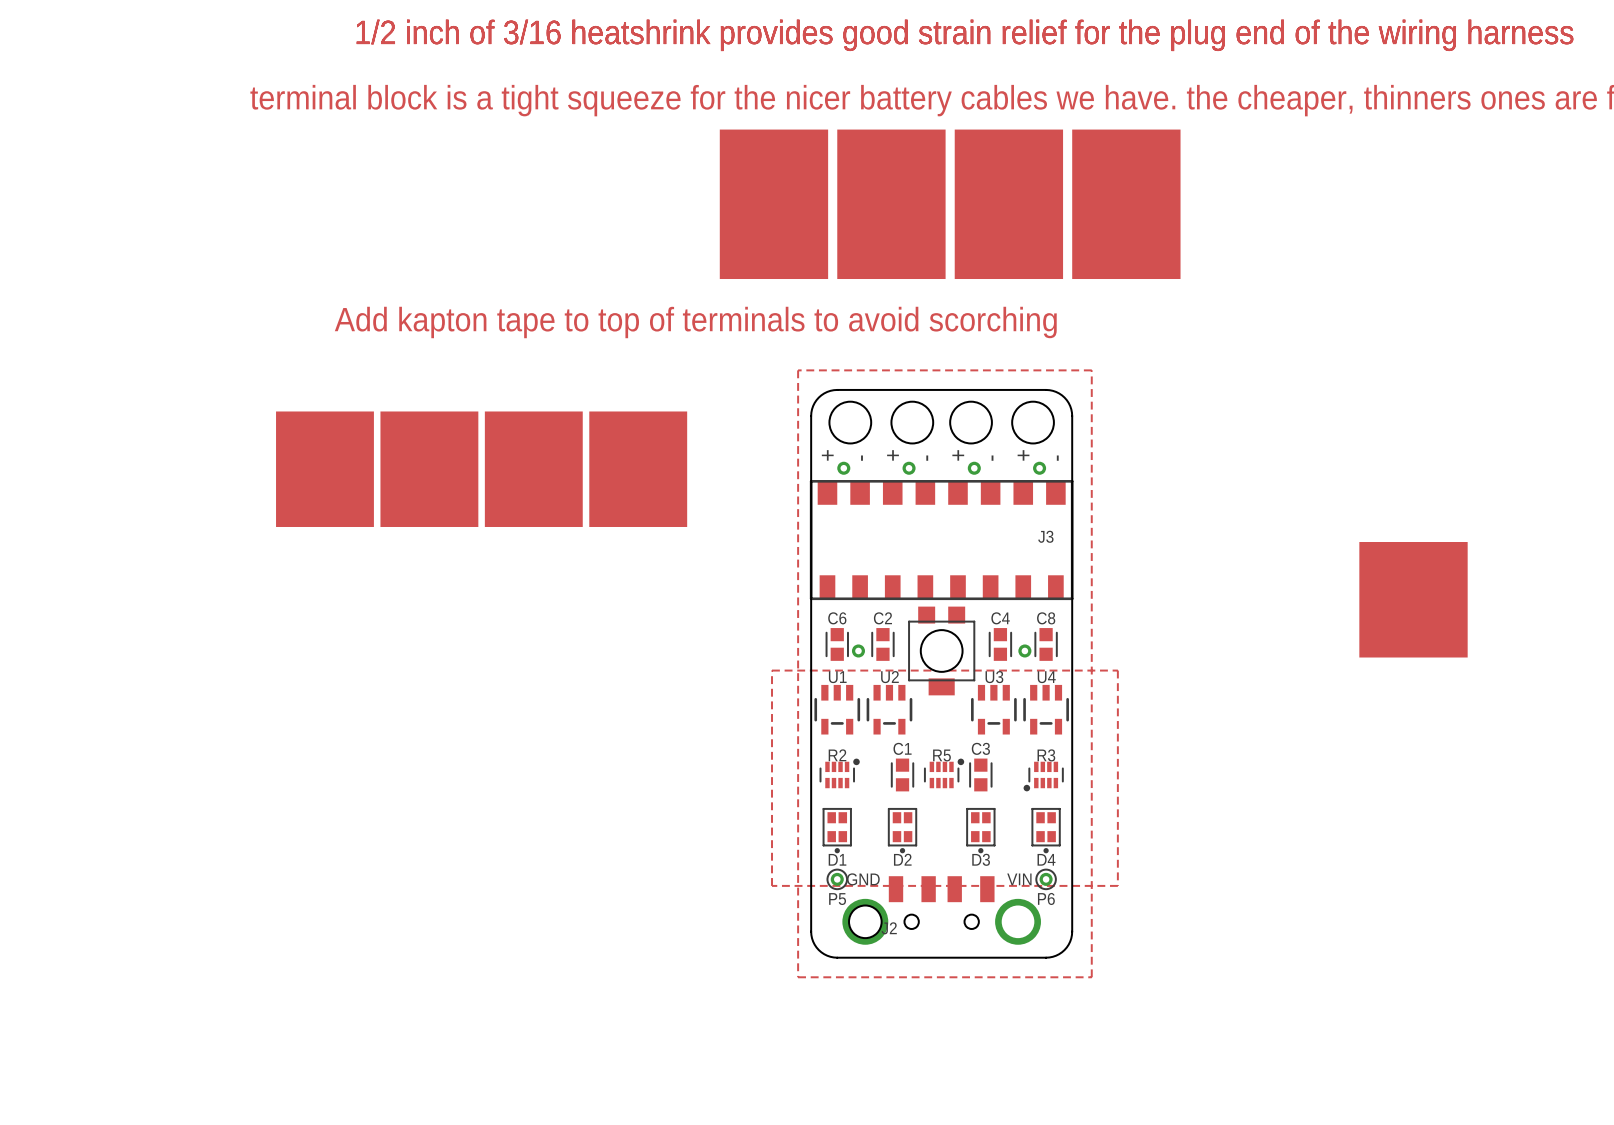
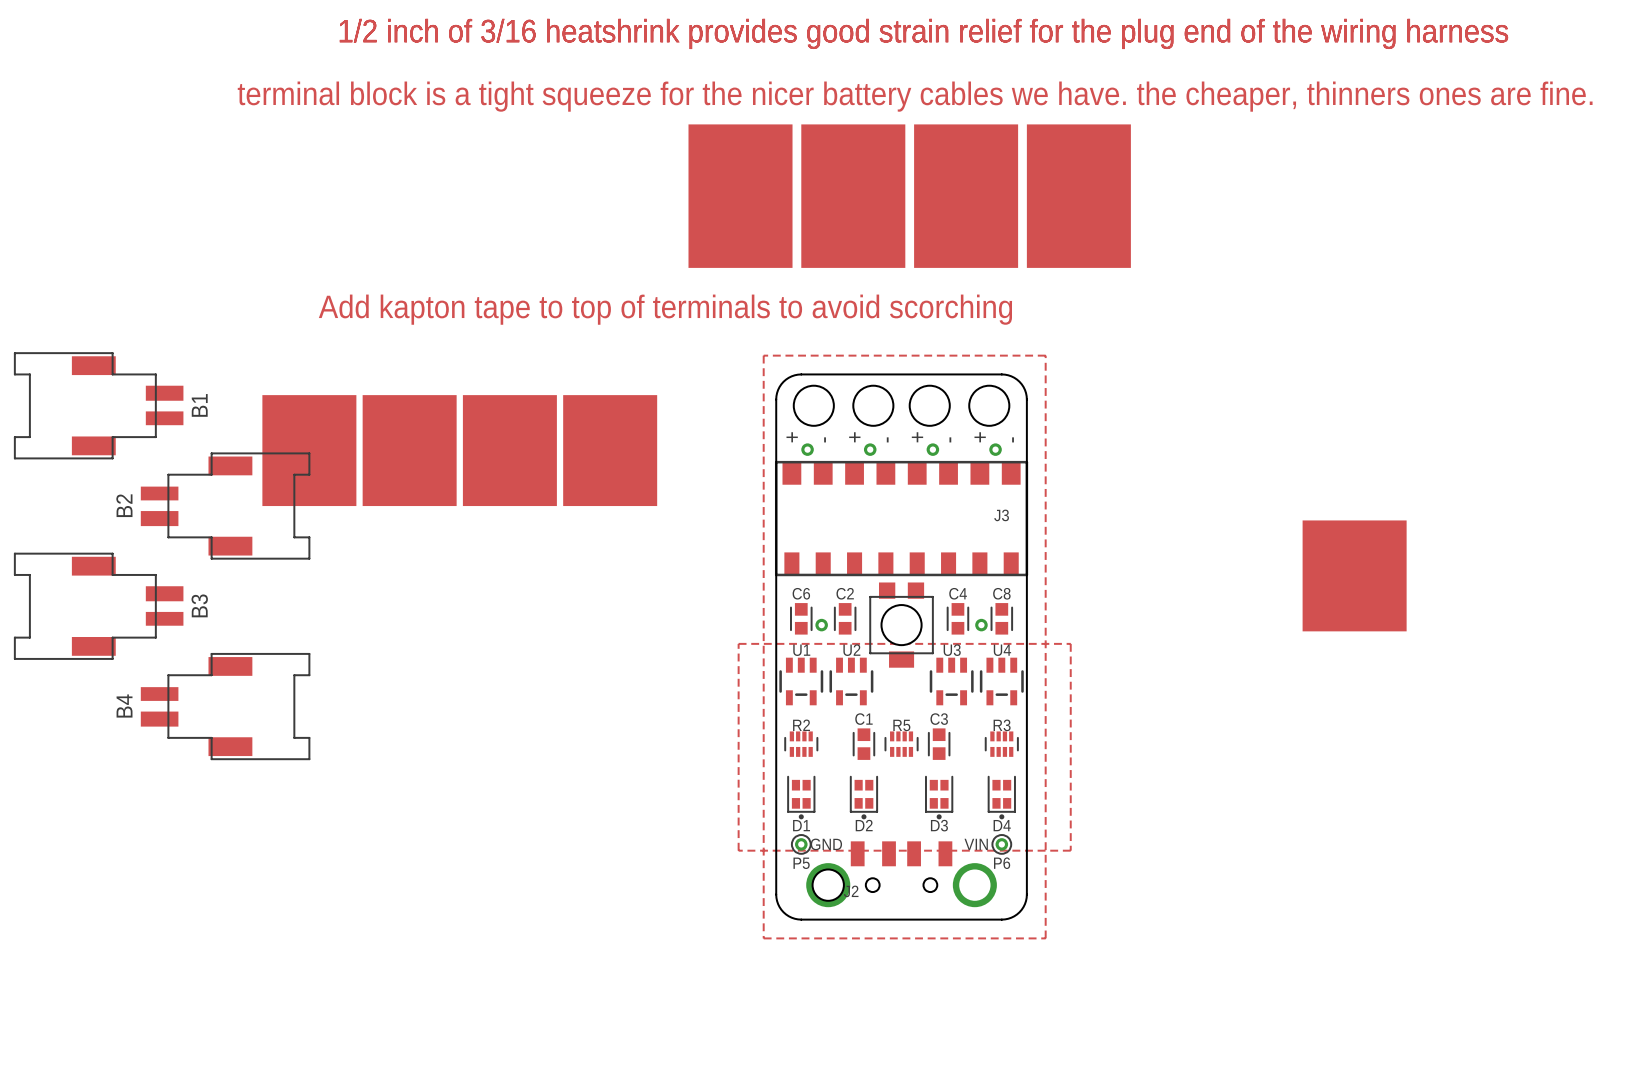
B1: none -> (98, 405)
B2: none -> (225, 506)
B3: none -> (98, 606)
B4: none -> (225, 706)
R2 footprint: [819, 758, 860, 789] -> [784, 731, 819, 757]
R5 footprint: [924, 758, 965, 789] -> [884, 731, 919, 757]
R3 footprint: [1023, 761, 1064, 792] -> [984, 731, 1019, 757]
D1 footprint: [822, 808, 852, 854] -> [787, 775, 816, 820]
D2 footprint: [887, 808, 918, 854] -> [850, 775, 878, 820]
D3 footprint: [966, 808, 996, 854] -> [925, 775, 954, 820]
D4 footprint: [1031, 808, 1061, 854] -> [987, 775, 1016, 820]

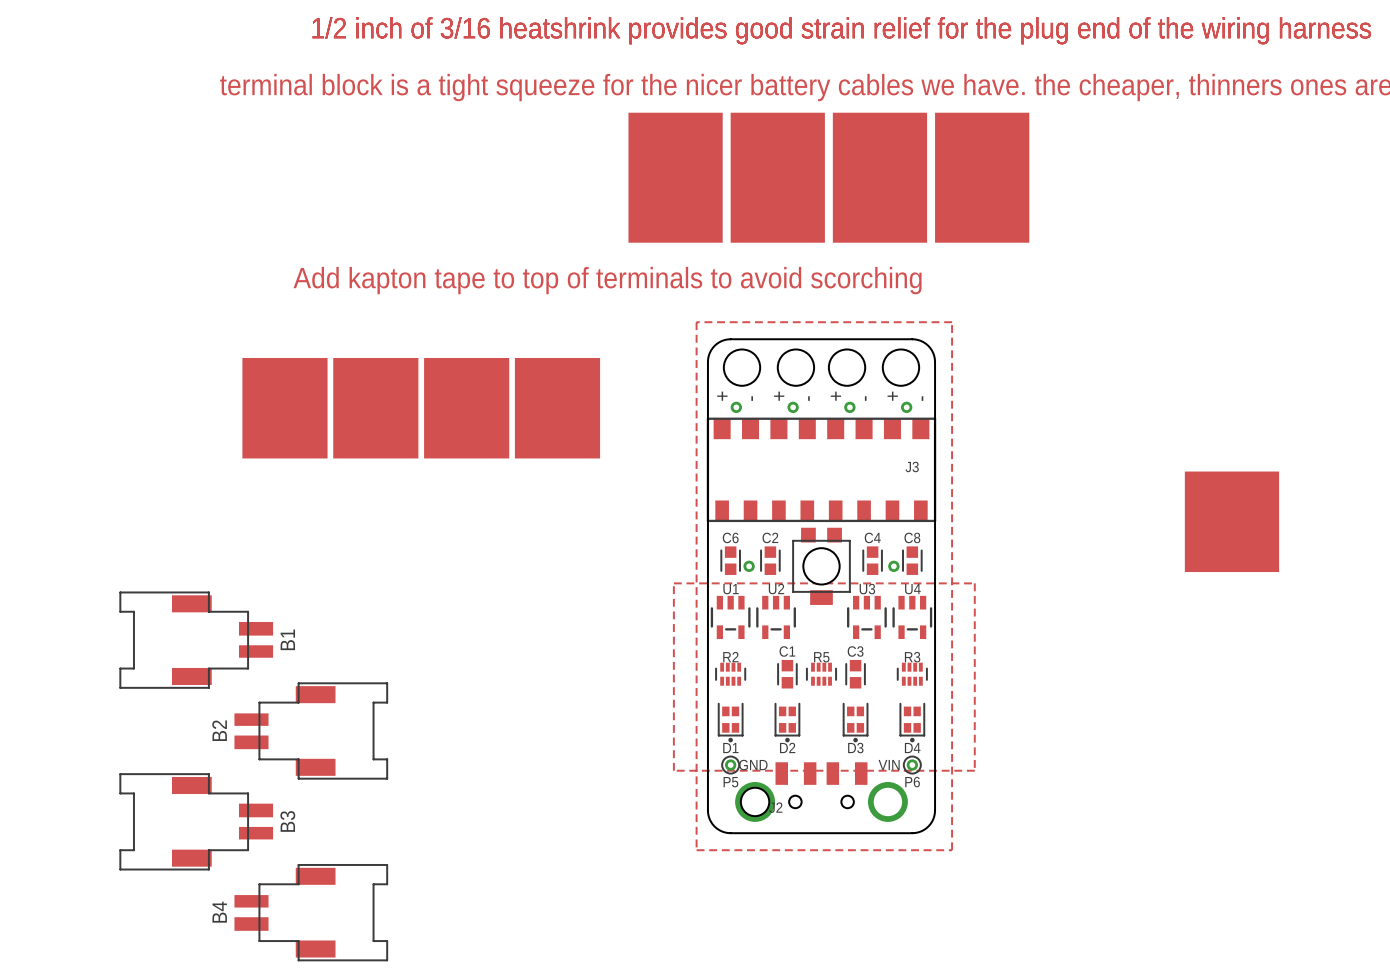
B1 position: (98, 405) -> (196, 640)
B2 position: (225, 506) -> (311, 730)
B3 position: (98, 606) -> (196, 821)
B4 position: (225, 706) -> (311, 912)

